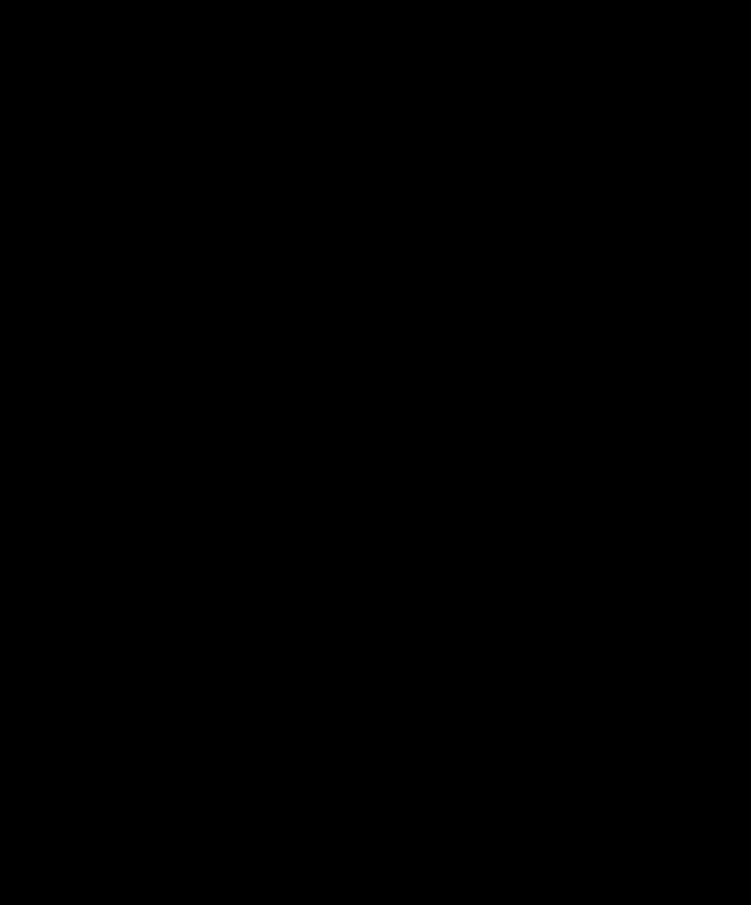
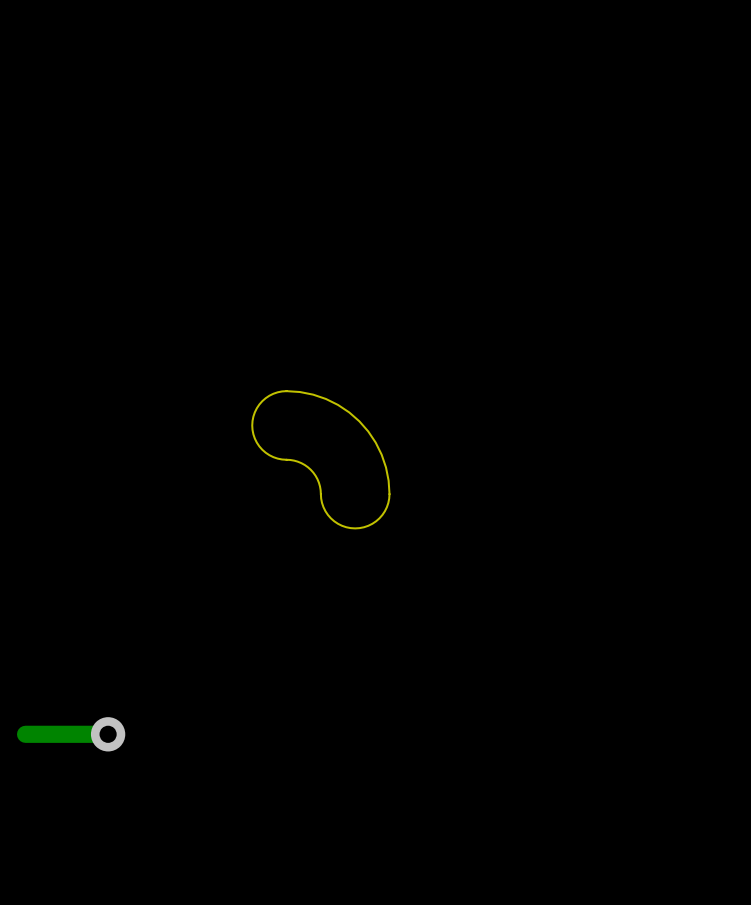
board edge: none -> (286, 391) (269, 395) (256, 408) (252, 425) (256, 442) (269, 455) (297, 461) (310, 469) (318, 482) (323, 507) (334, 521) (342, 525) (355, 528) (372, 523) (384, 511) (389, 494) (386, 467) (375, 442) (359, 421) (338, 404) (313, 394) (286, 391)
track: none -> (108, 734) (25, 734)
via: none -> (108, 734)

